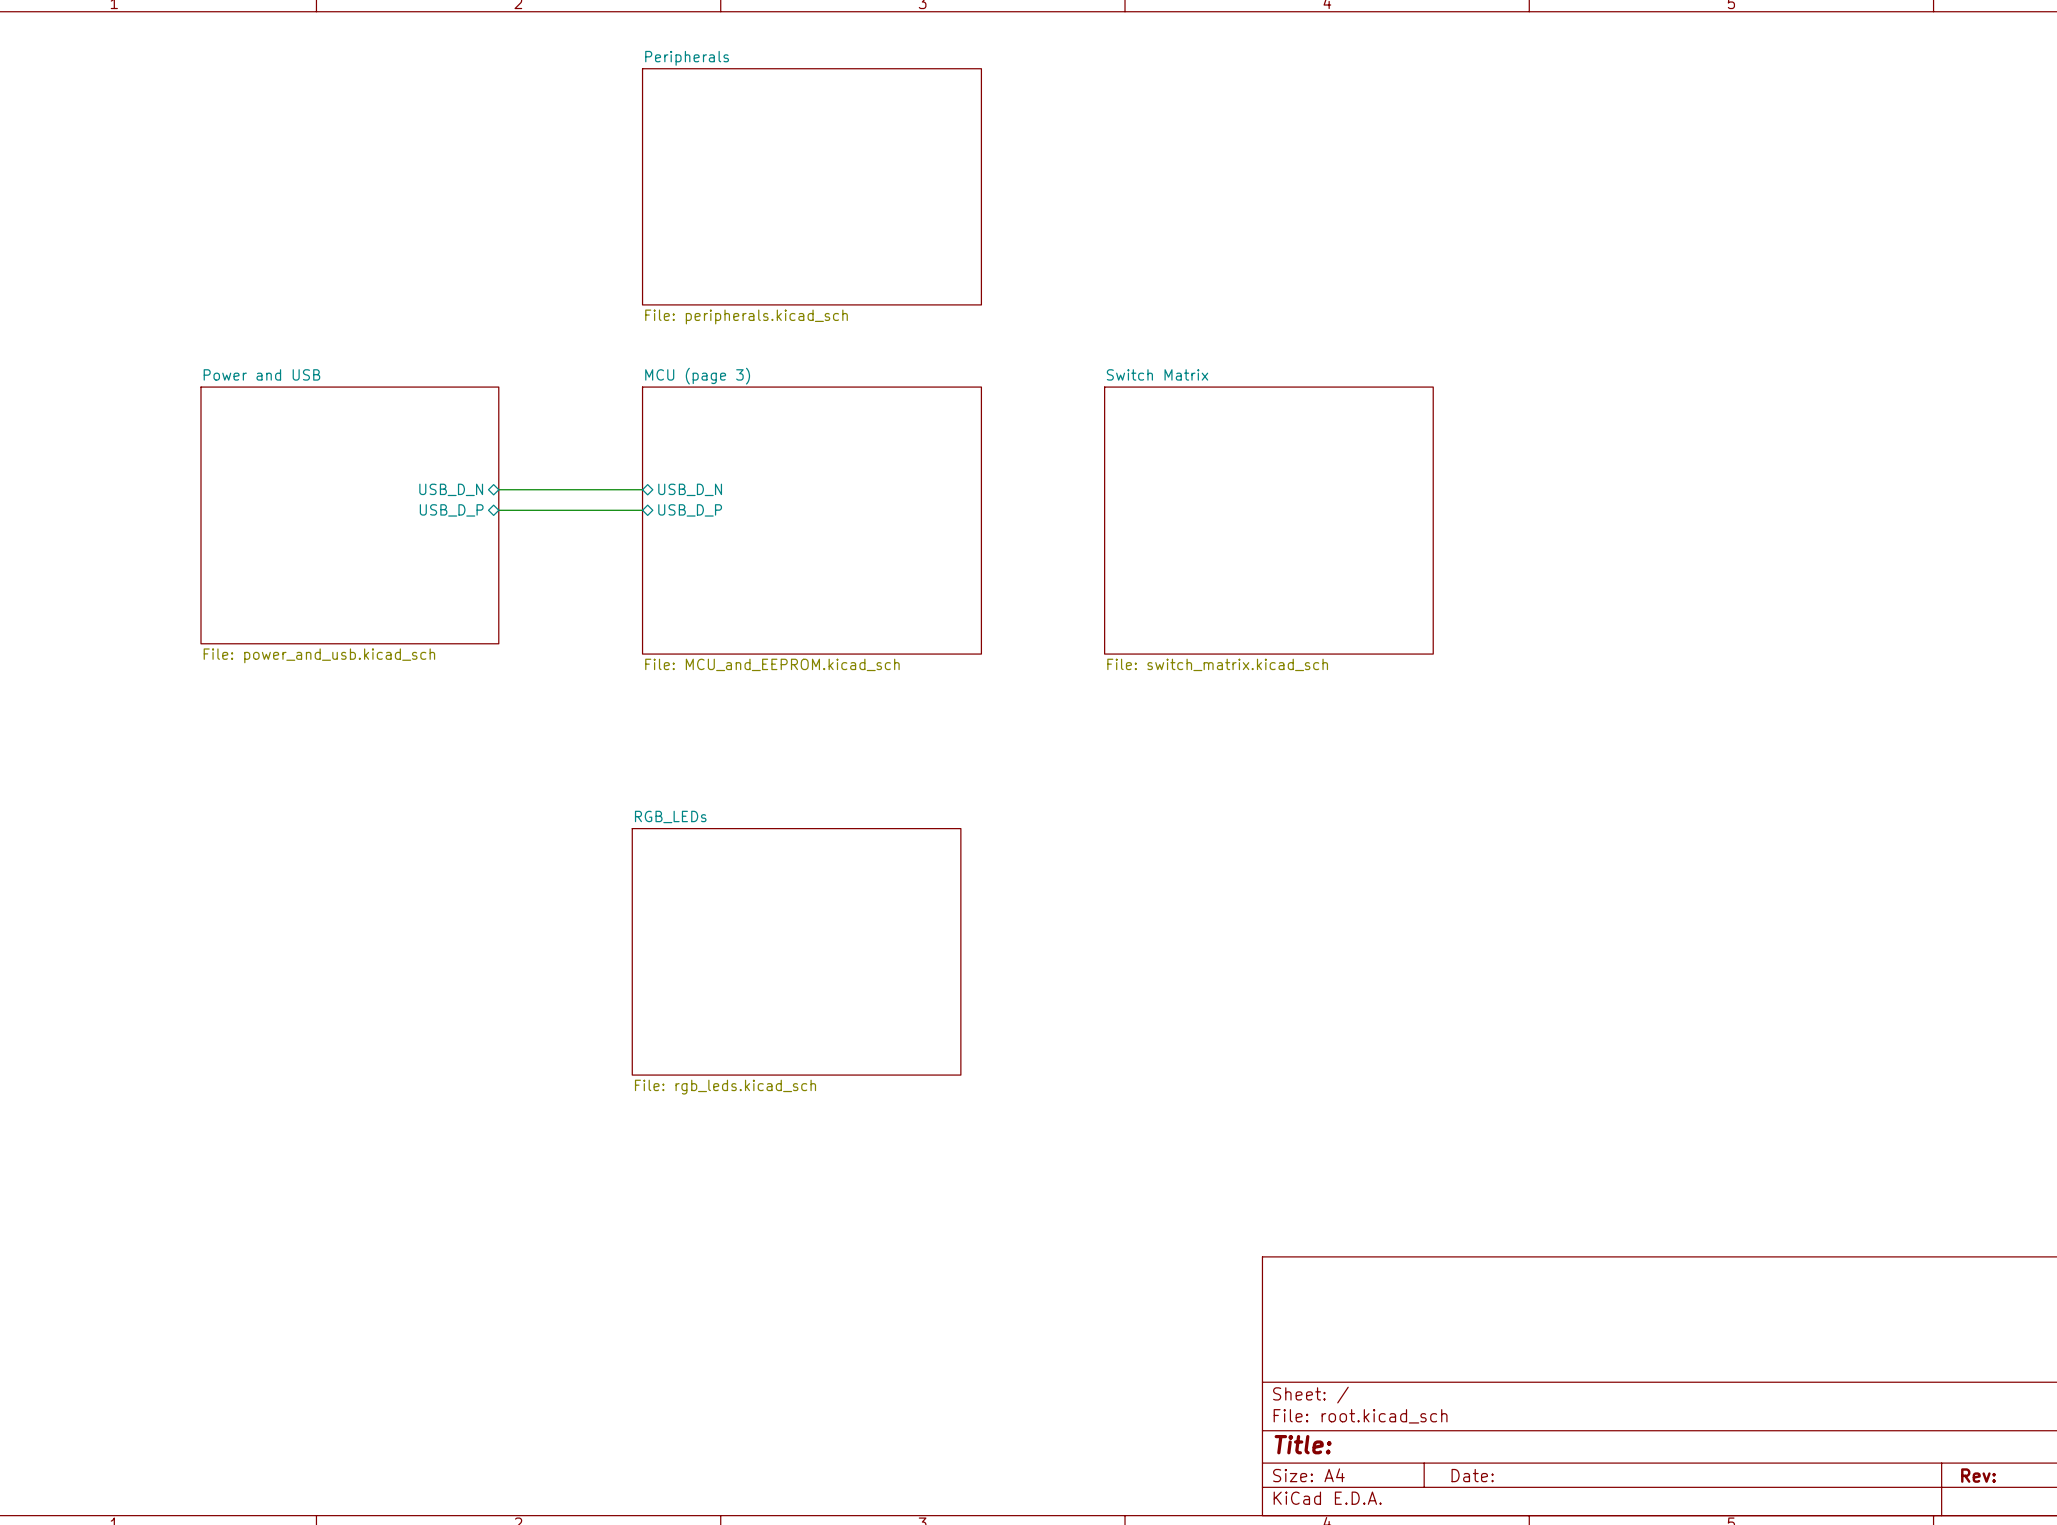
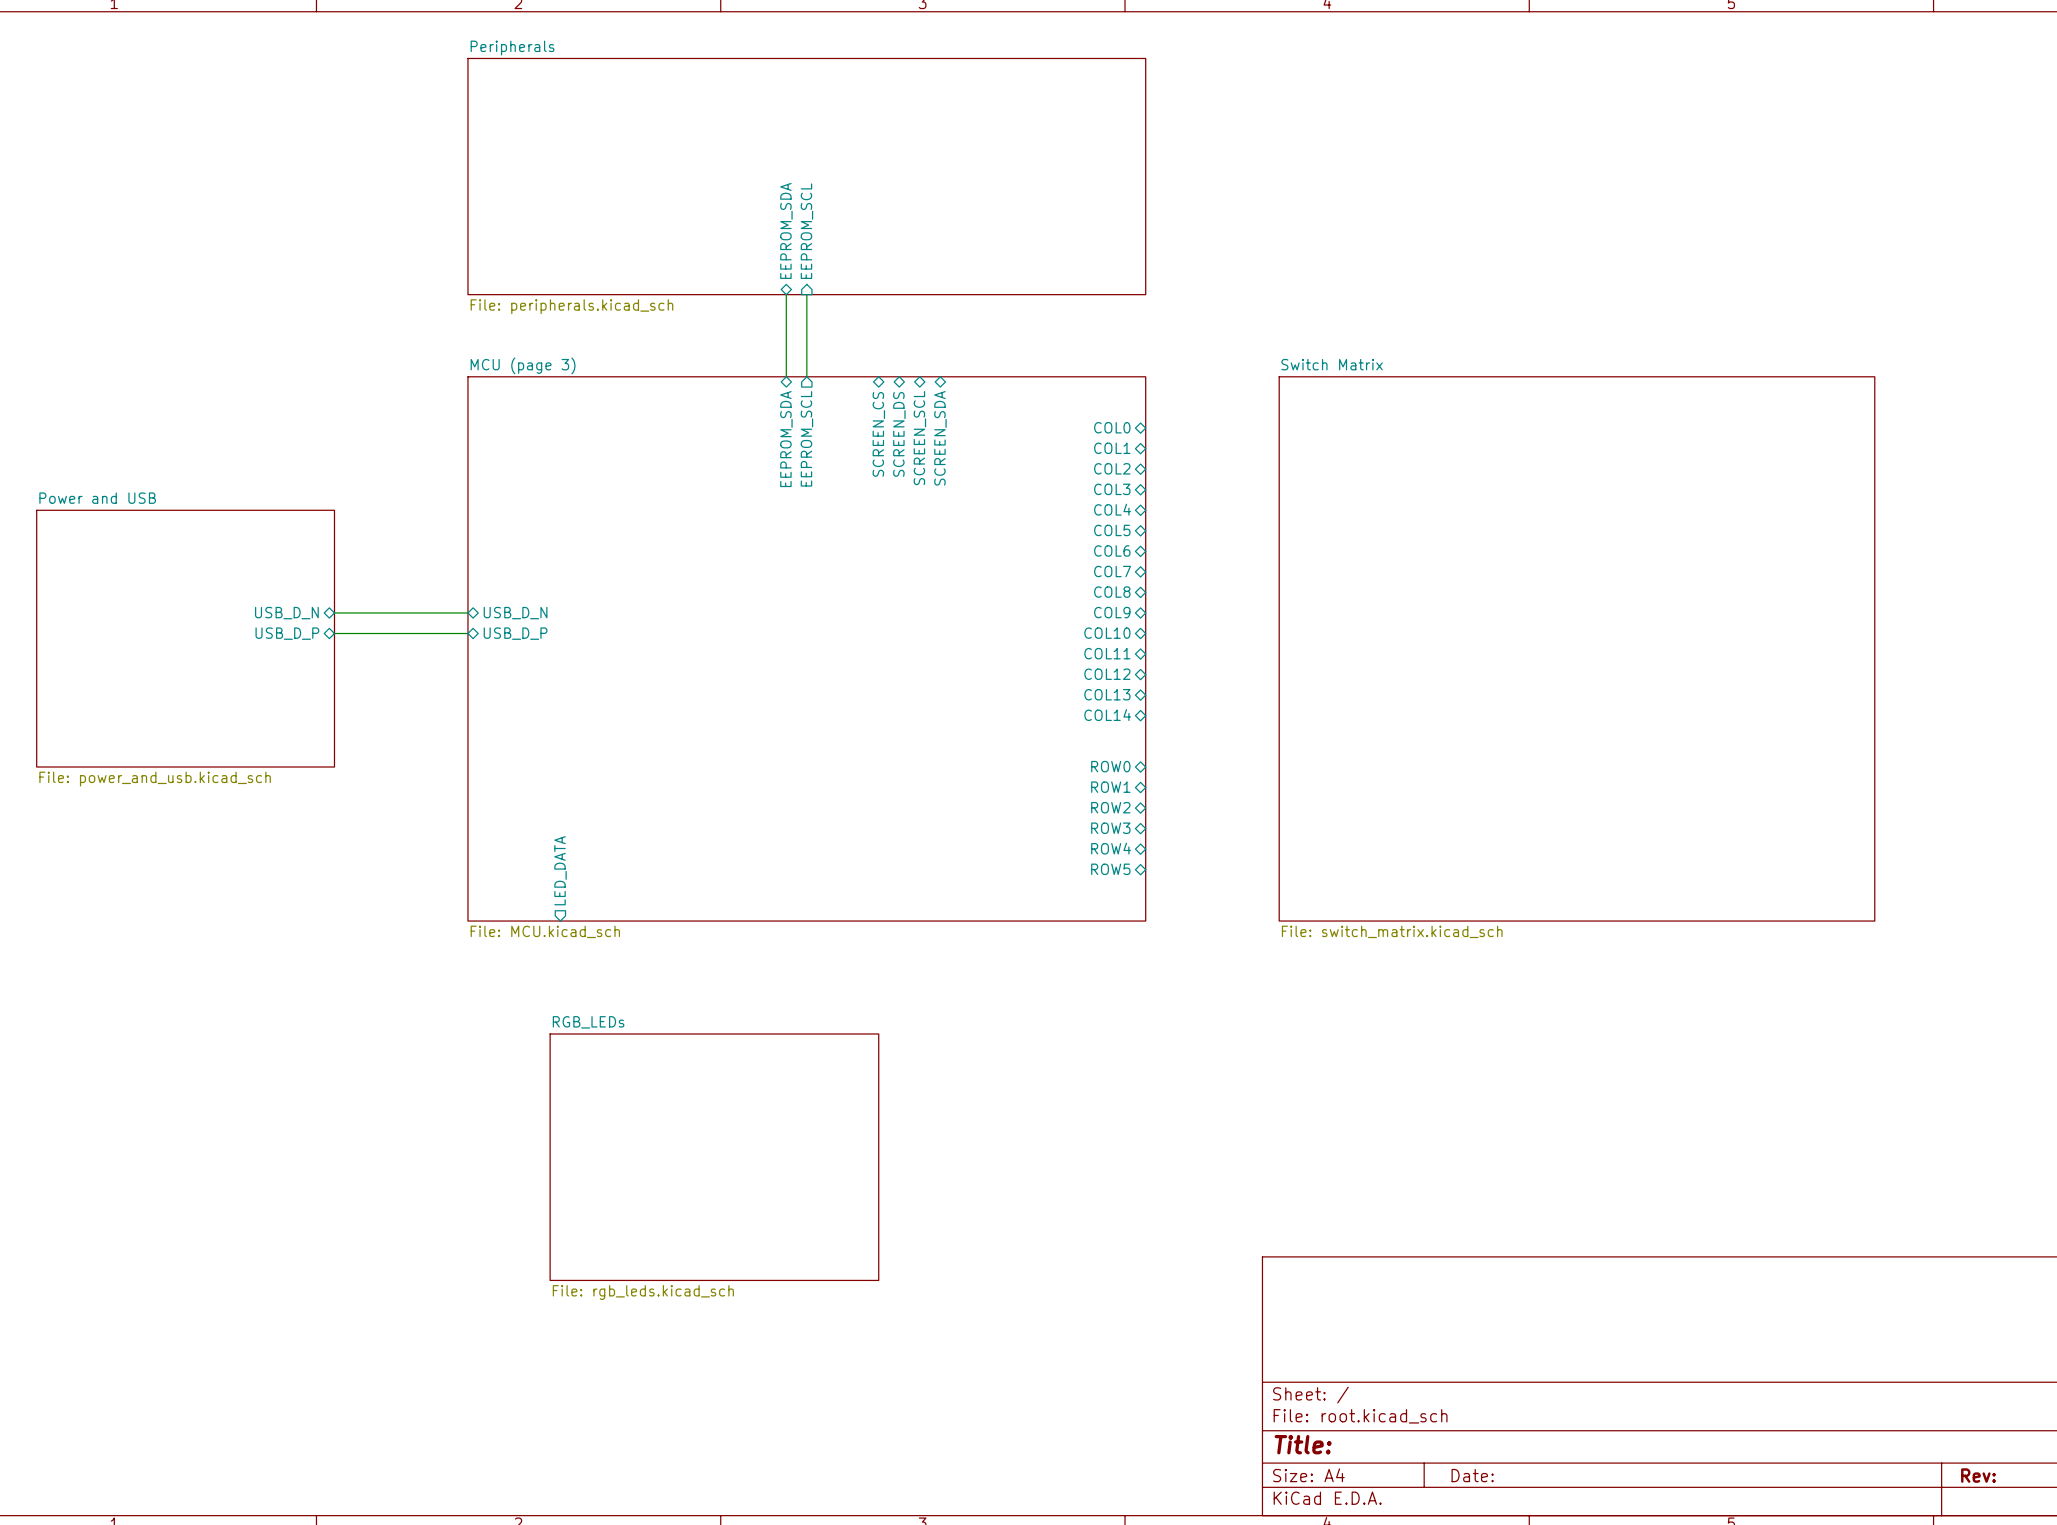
sheet Peripherals: none -> File: peripherals.kicad_sch (806, 176)
sheet Peripherals: File: peripherals.kicad_sch (811, 186) -> none
sheet pin: none -> EEPROM_SDA (786, 230)
sheet pin: none -> EEPROM_SCL (806, 231)
wire: none -> (786, 294) (786, 376)
wire: none -> (806, 294) (806, 376)
sheet MCU (page 3) name position: MCU (page 3) (697, 376) -> MCU (page 3) (523, 365)
sheet MCU (page 3) shape: [641, 386, 983, 655] -> [467, 376, 1147, 922]
sheet pin: none -> COL0 (1112, 427)
sheet pin: none -> SCREEN_CS (878, 434)
sheet pin: none -> SCREEN_DS (899, 434)
sheet pin: none -> EEPROM_SCL (806, 438)
sheet pin: none -> SCREEN_SCL (919, 438)
sheet pin: none -> SCREEN_SDA (940, 438)
sheet pin: none -> EEPROM_SDA (786, 439)
sheet pin: none -> COL1 (1112, 448)
sheet pin: none -> COL2 (1112, 468)
sheet pin: USB_D_N (451, 489) -> none
wire: (498, 489) (642, 489) -> none
sheet pin: USB_D_N (690, 489) -> none
sheet pin: none -> COL3 (1112, 489)
sheet pin: none -> COL4 (1112, 509)
sheet pin: USB_D_P (451, 510) -> none
wire: (498, 510) (642, 510) -> none
sheet pin: USB_D_P (690, 510) -> none
sheet Power and USB: File: power_and_usb.kicad_sch (349, 515) -> none
sheet Switch Matrix: File: switch_matrix.kicad_sch (1268, 520) -> none
sheet pin: none -> COL5 (1112, 530)
sheet pin: none -> COL6 (1112, 550)
sheet pin: none -> COL7 (1112, 571)
sheet pin: none -> COL8 (1112, 592)
wire: none -> (334, 612) (467, 612)
sheet pin: none -> COL9 (1112, 612)
sheet pin: none -> USB_D_N (286, 613)
sheet pin: none -> USB_D_N (515, 613)
sheet pin: none -> USB_D_P (287, 633)
wire: none -> (334, 633) (467, 633)
sheet pin: none -> USB_D_P (515, 633)
sheet pin: none -> COL10 (1107, 633)
sheet Power and USB: none -> File: power_and_usb.kicad_sch (185, 638)
sheet Switch Matrix: none -> File: switch_matrix.kicad_sch (1576, 648)
sheet pin: none -> COL11 (1107, 653)
sheet MCU (page 3) value: File: MCU_and_EEPROM.kicad_sch (772, 664) -> File: MCU.kicad_sch (545, 931)
sheet pin: none -> COL12 (1107, 674)
sheet pin: none -> COL13 (1107, 694)
sheet pin: none -> COL14 (1107, 715)
sheet pin: none -> ROW0 (1110, 766)
sheet pin: none -> ROW1 (1110, 787)
sheet pin: none -> ROW2 (1110, 807)
sheet pin: none -> ROW3 (1110, 828)
sheet pin: none -> ROW4 (1111, 848)
sheet pin: none -> ROW5 (1110, 869)
sheet pin: none -> LED_DATA (560, 870)
sheet RGB_LEDs: File: rgb_leds.kicad_sch (796, 951) -> none
sheet RGB_LEDs: none -> File: rgb_leds.kicad_sch (714, 1157)

